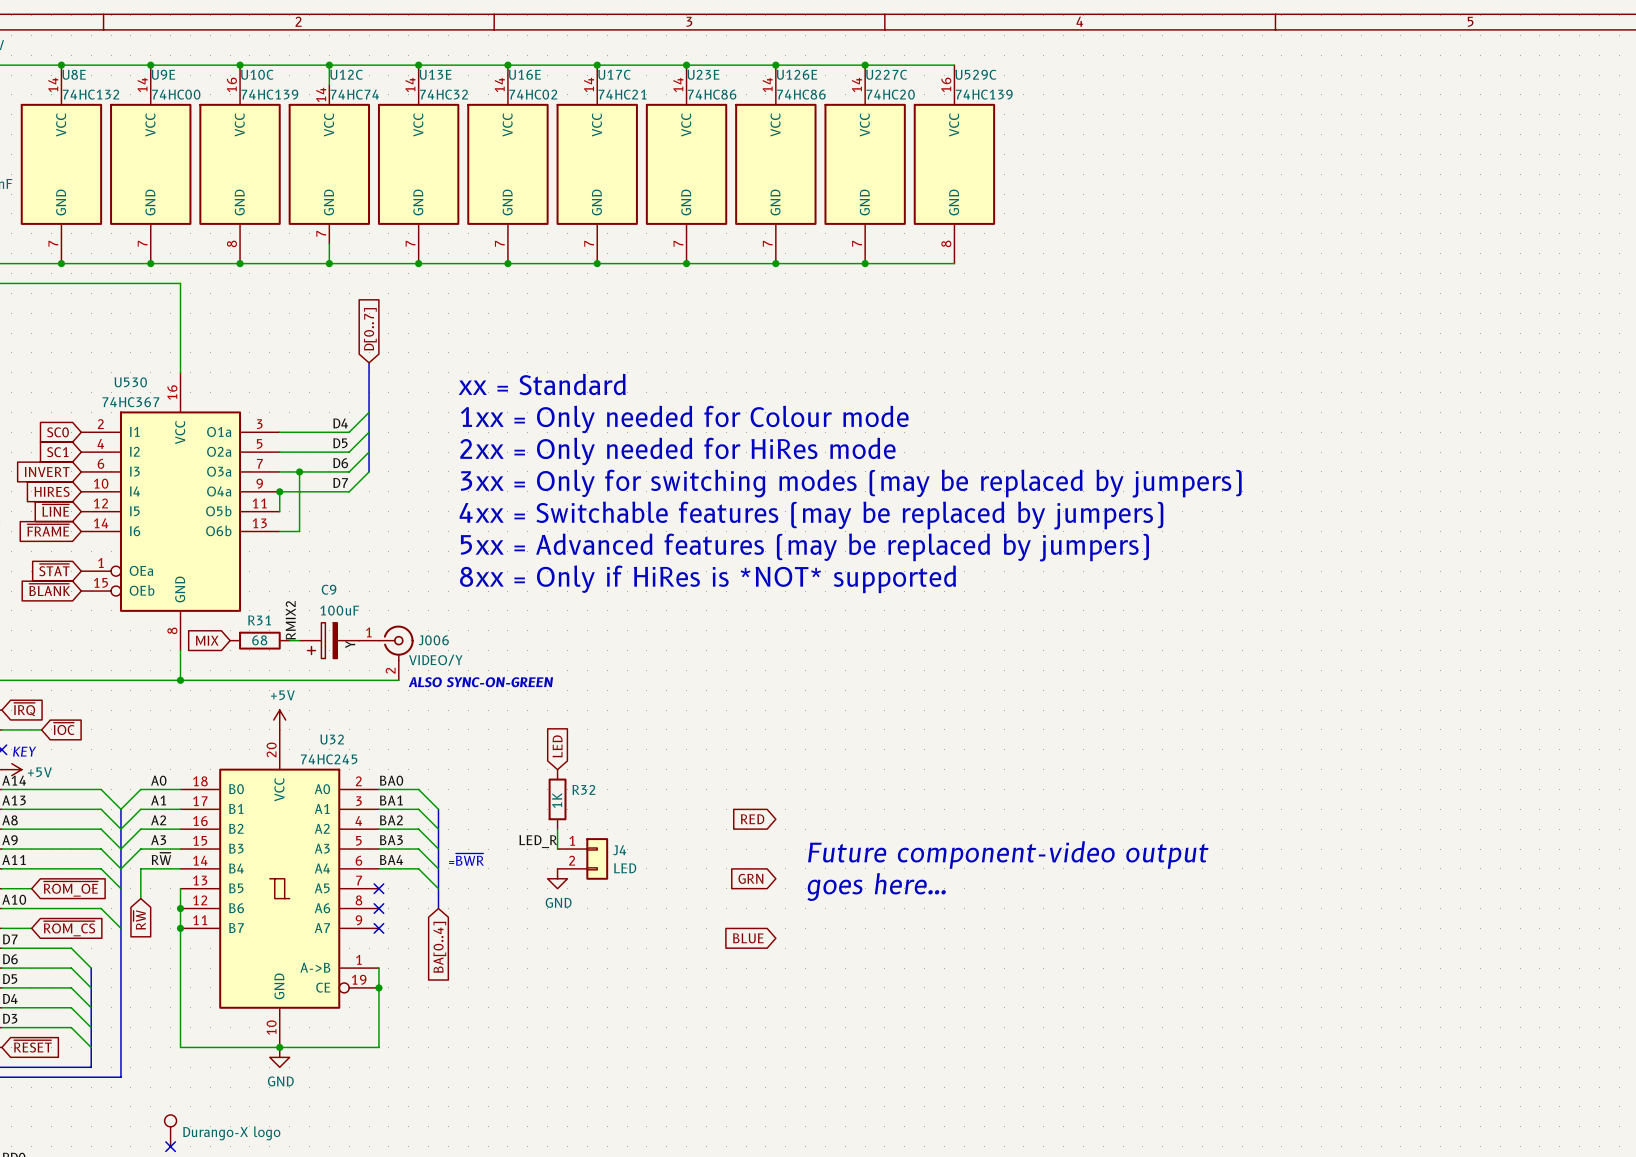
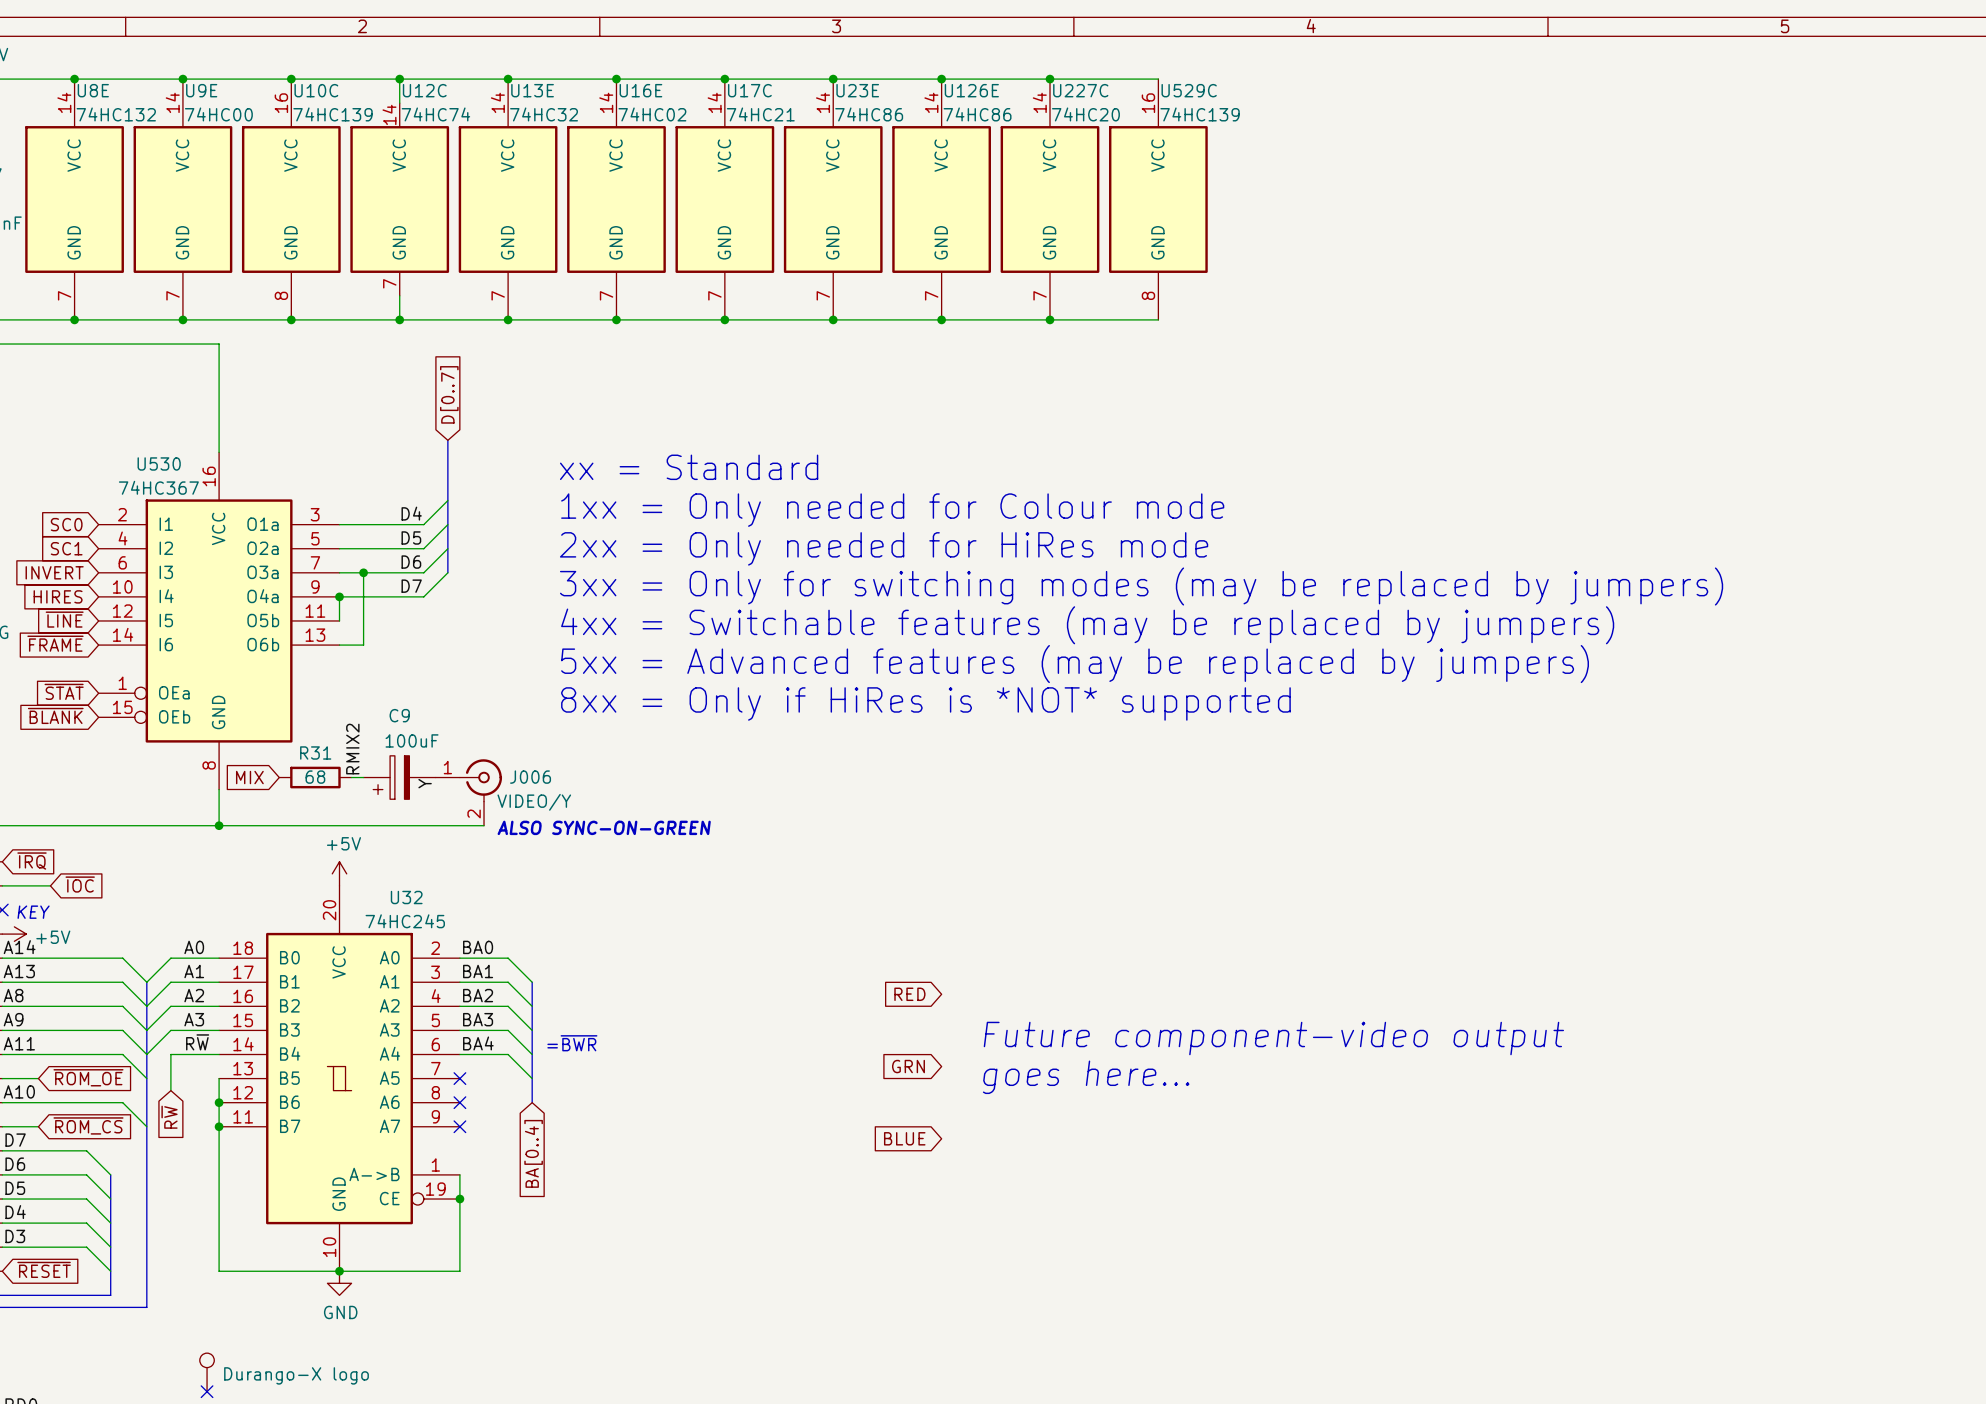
global label: LED (557, 746) -> none
R32: 1K (557, 799) -> none
wire: (557, 829) (557, 849) -> none
label: LED_R (538, 841) -> none
J4: LED (582, 858) -> none
power symbol: GND (557, 878) -> none

